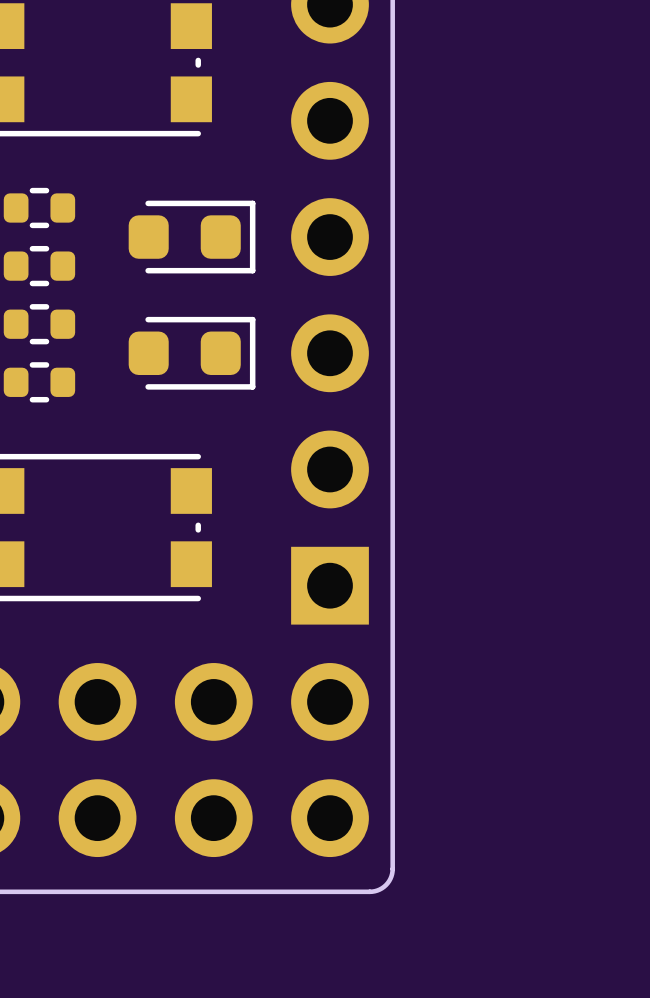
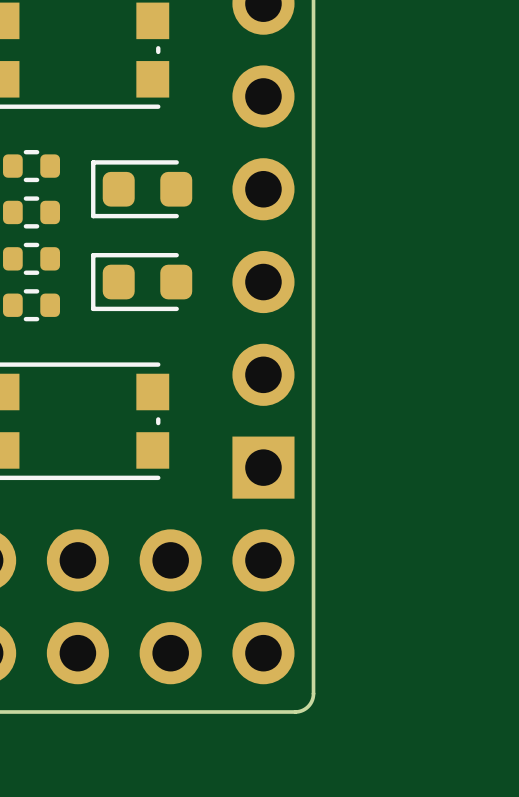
part rotation: 0° (192, 237) -> 180° (141, 189)
part rotation: 0° (192, 353) -> 180° (141, 282)

